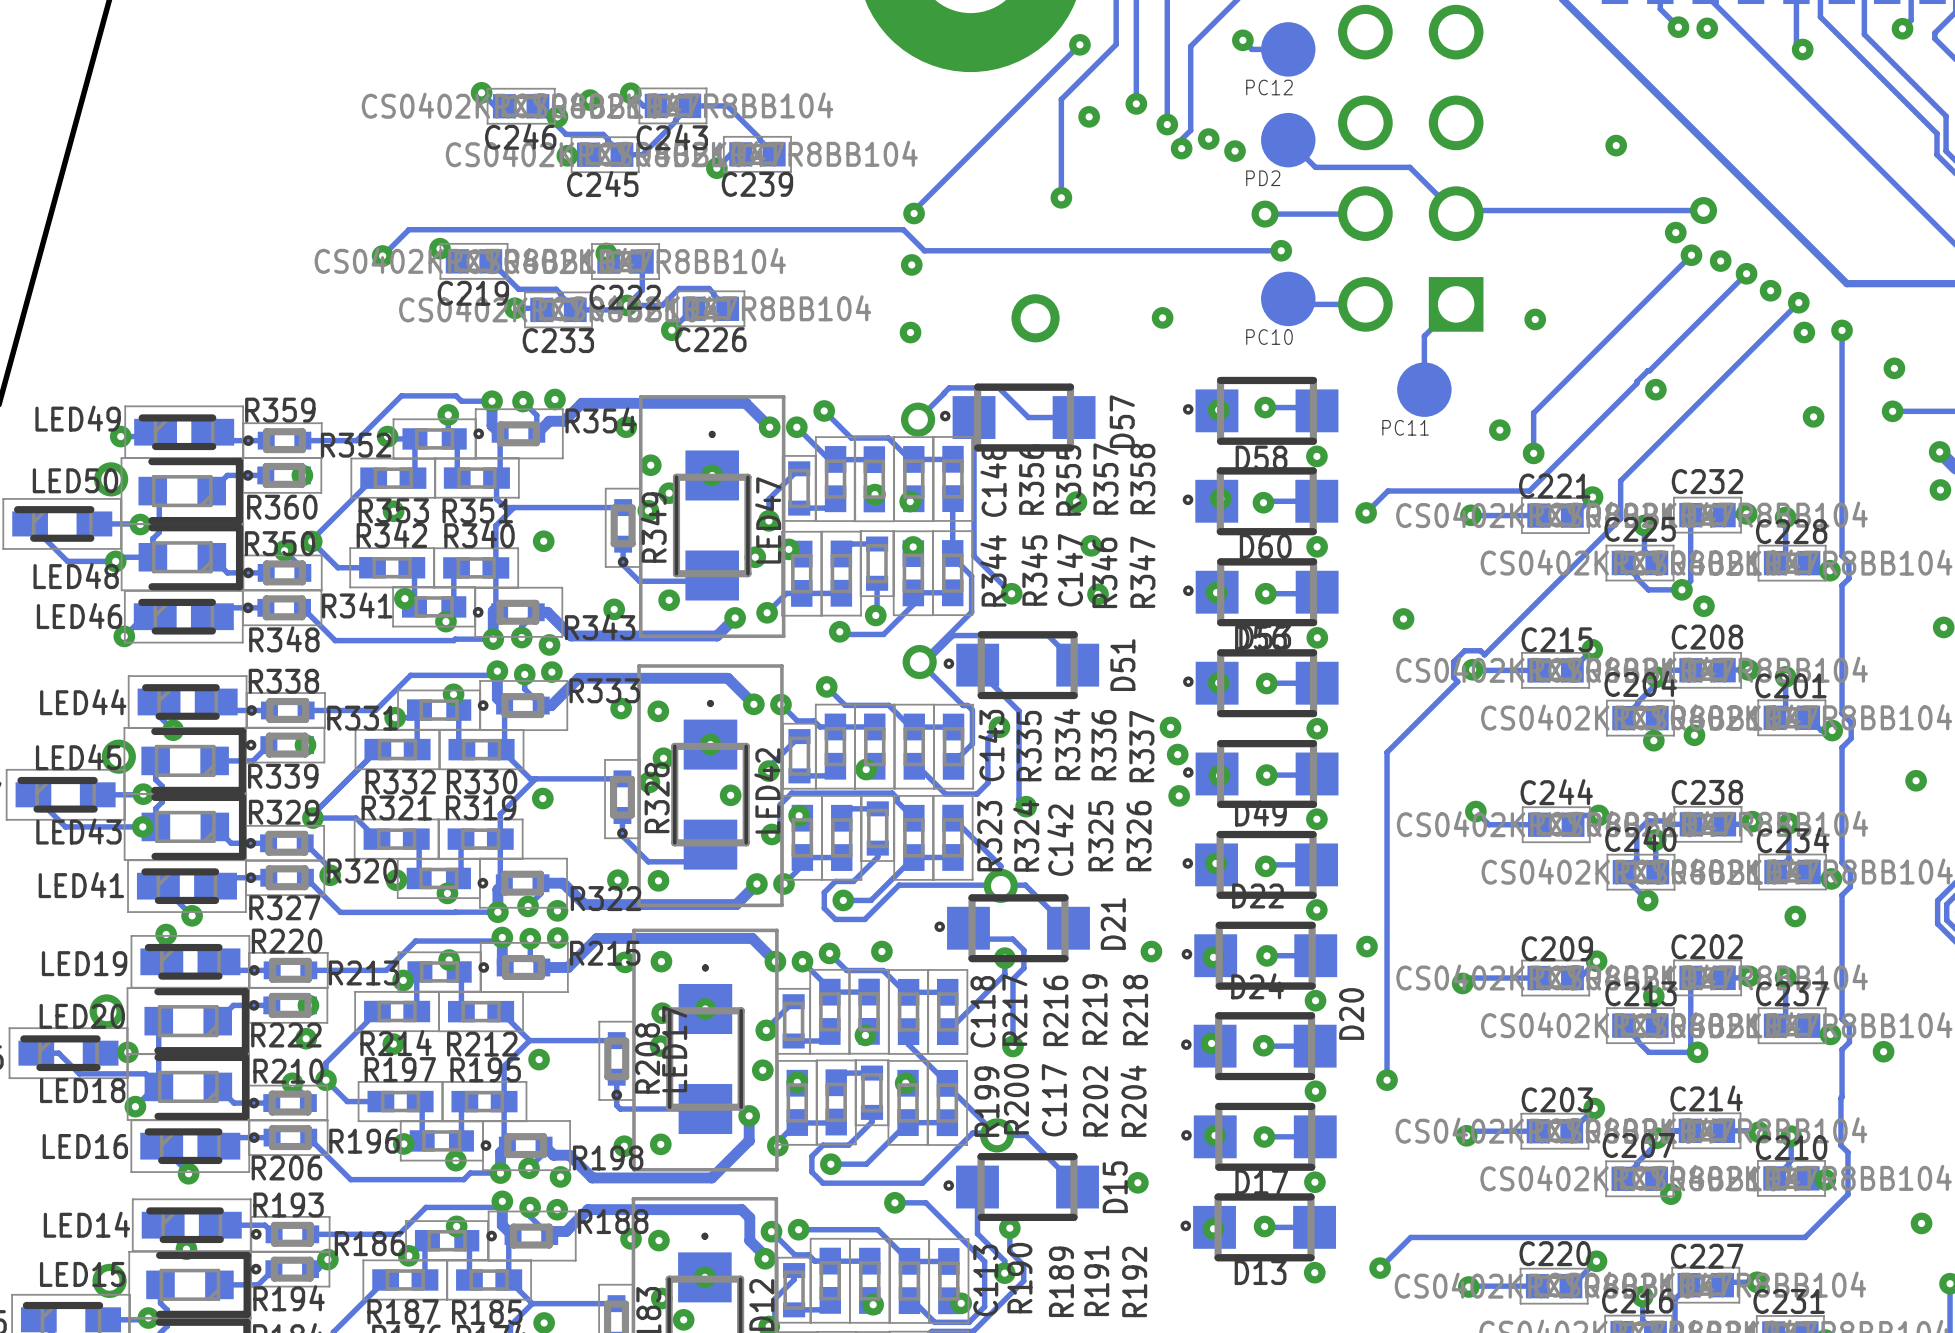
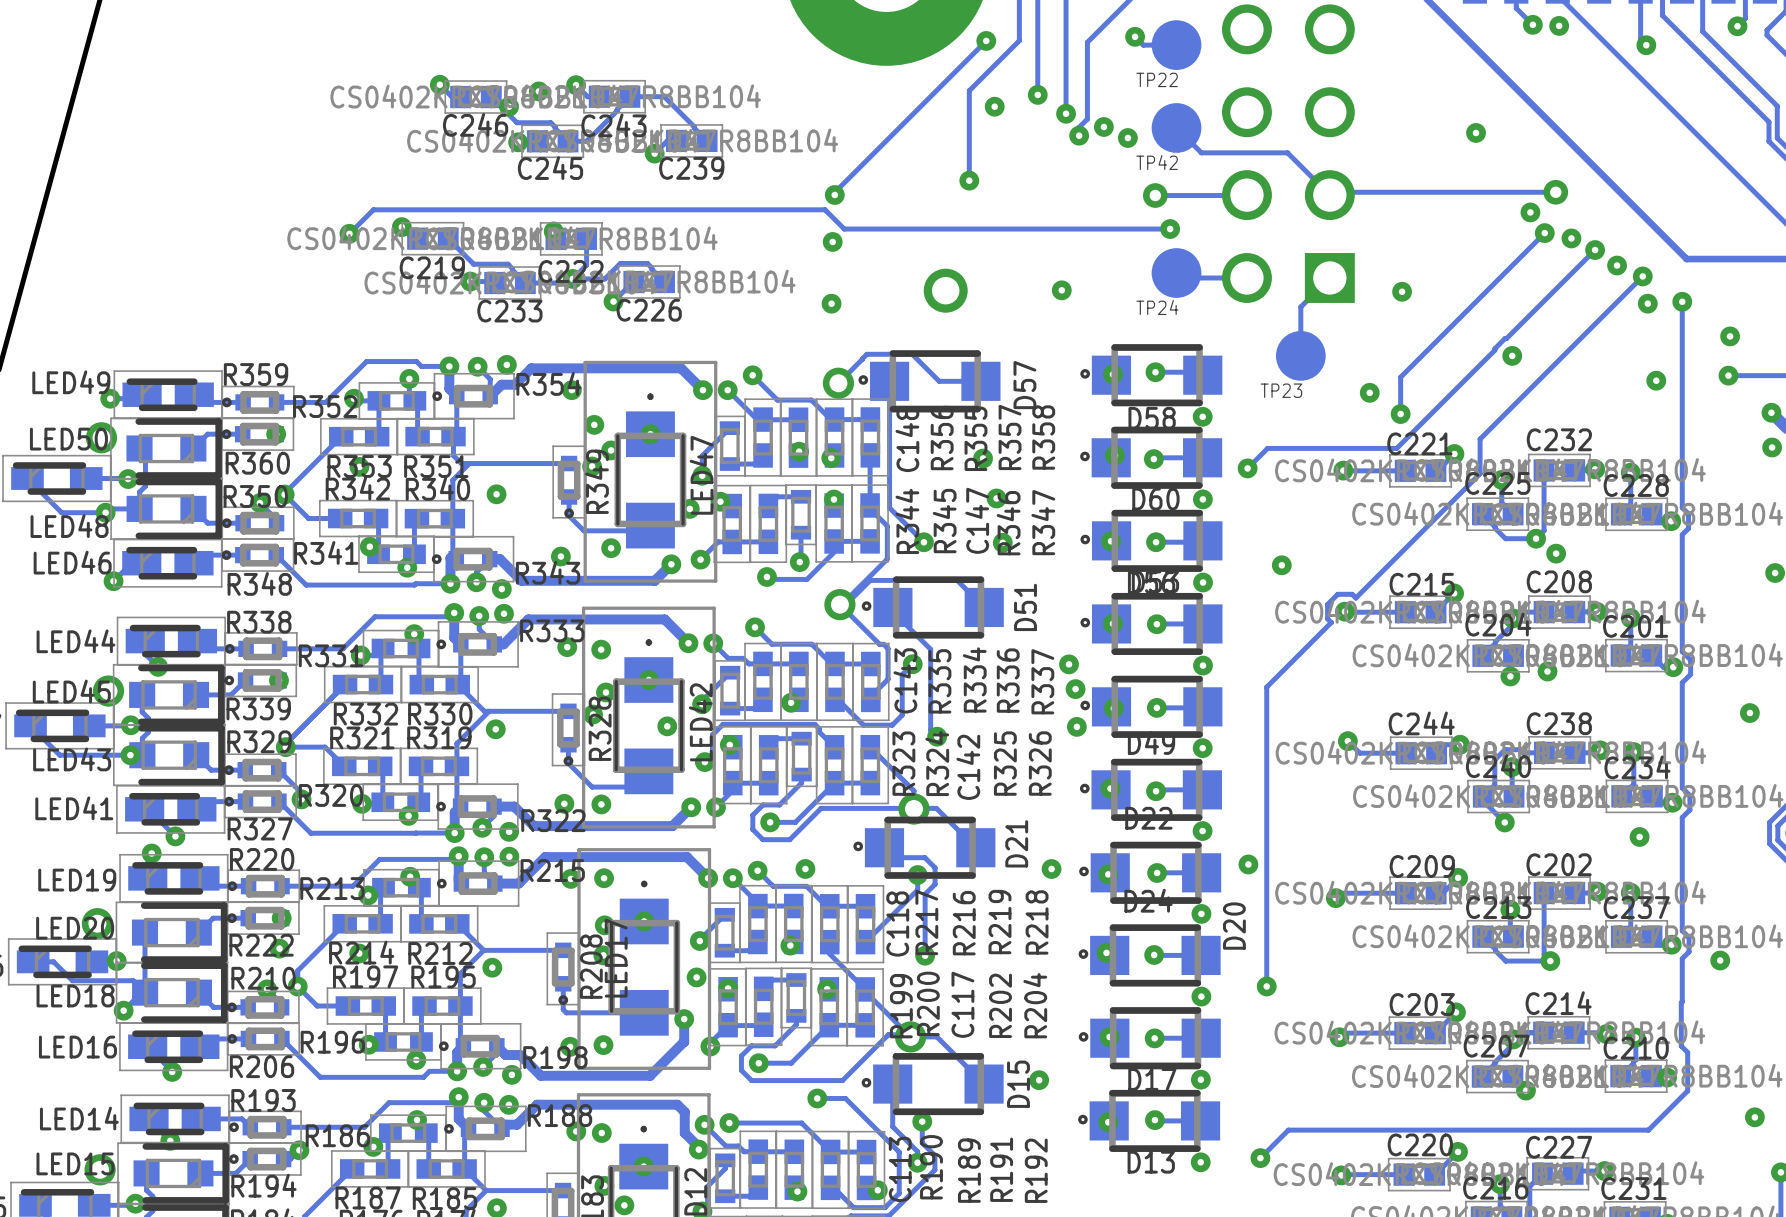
PC12 name: PC12 (1269, 87) -> TP22 (1157, 79)
PD2 name: PD2 (1263, 178) -> TP42 (1157, 162)
PC10 name: PC10 (1269, 337) -> TP24 (1157, 307)
PC11 name: PC11 (1405, 427) -> TP23 (1281, 390)

